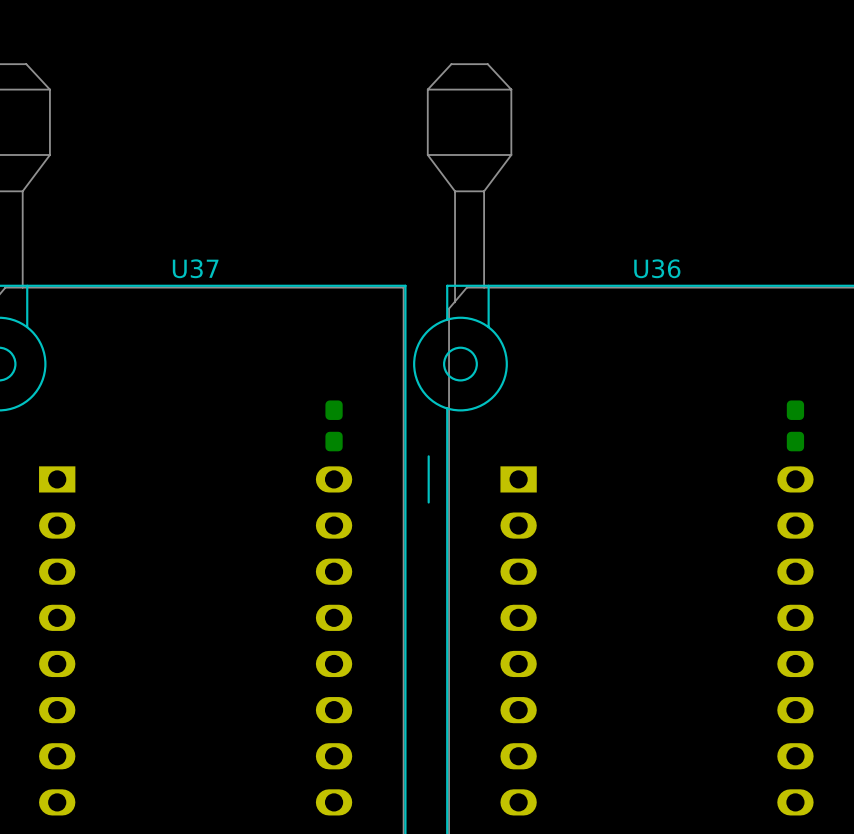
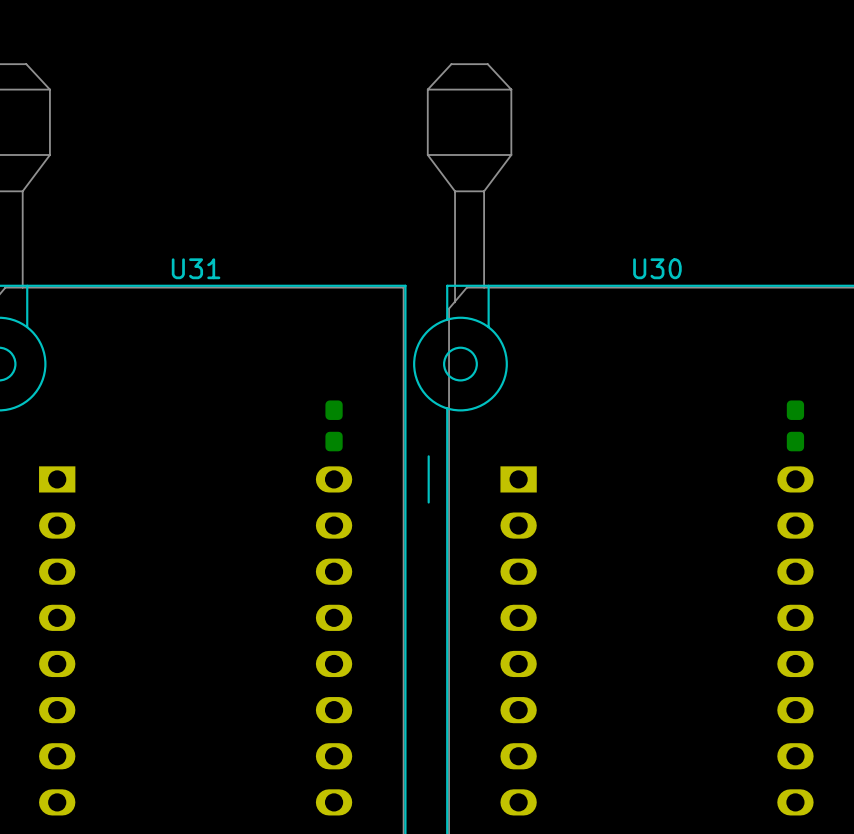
U37 name: U37 (195, 268) -> U31 (196, 268)
U36 name: U36 (657, 268) -> U30 (657, 268)

